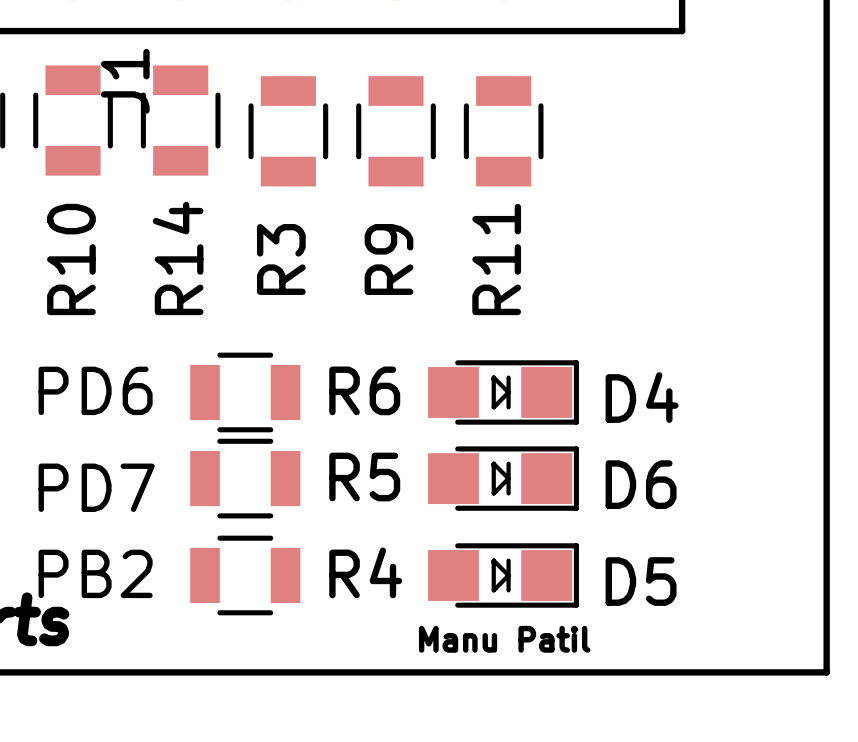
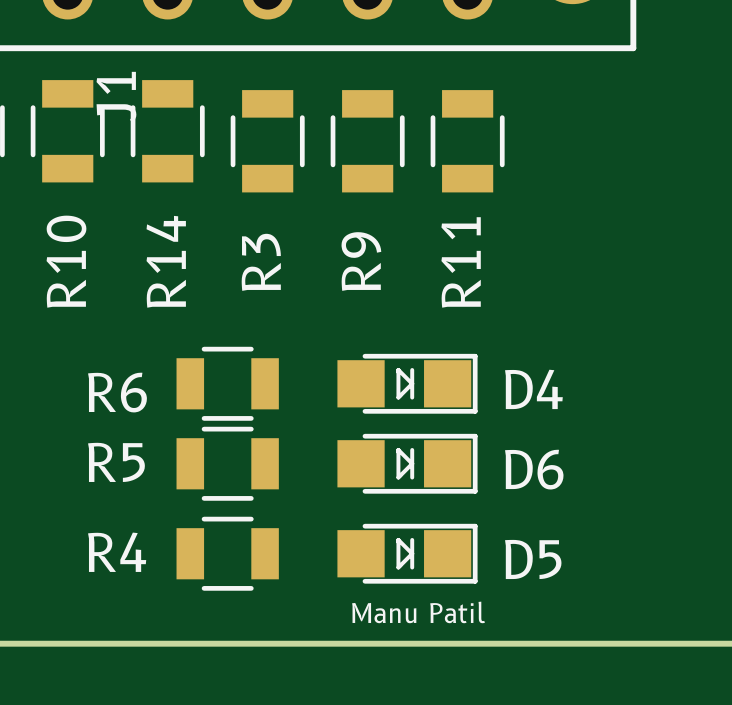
text: PD6 (95, 390) -> none
R6 name position: R6 (364, 390) -> R6 (117, 392)
D4 position: (503, 392) -> (407, 383)
R5 name position: R5 (364, 477) -> R5 (116, 462)
D6 position: (503, 478) -> (407, 463)
text: PD7 (96, 487) -> none
R4 name position: R4 (365, 572) -> R4 (117, 552)
text: PB2 (95, 573) -> none
D5 position: (503, 575) -> (407, 553)
text position: Manu Patil (504, 639) -> Manu Patil (418, 612)

